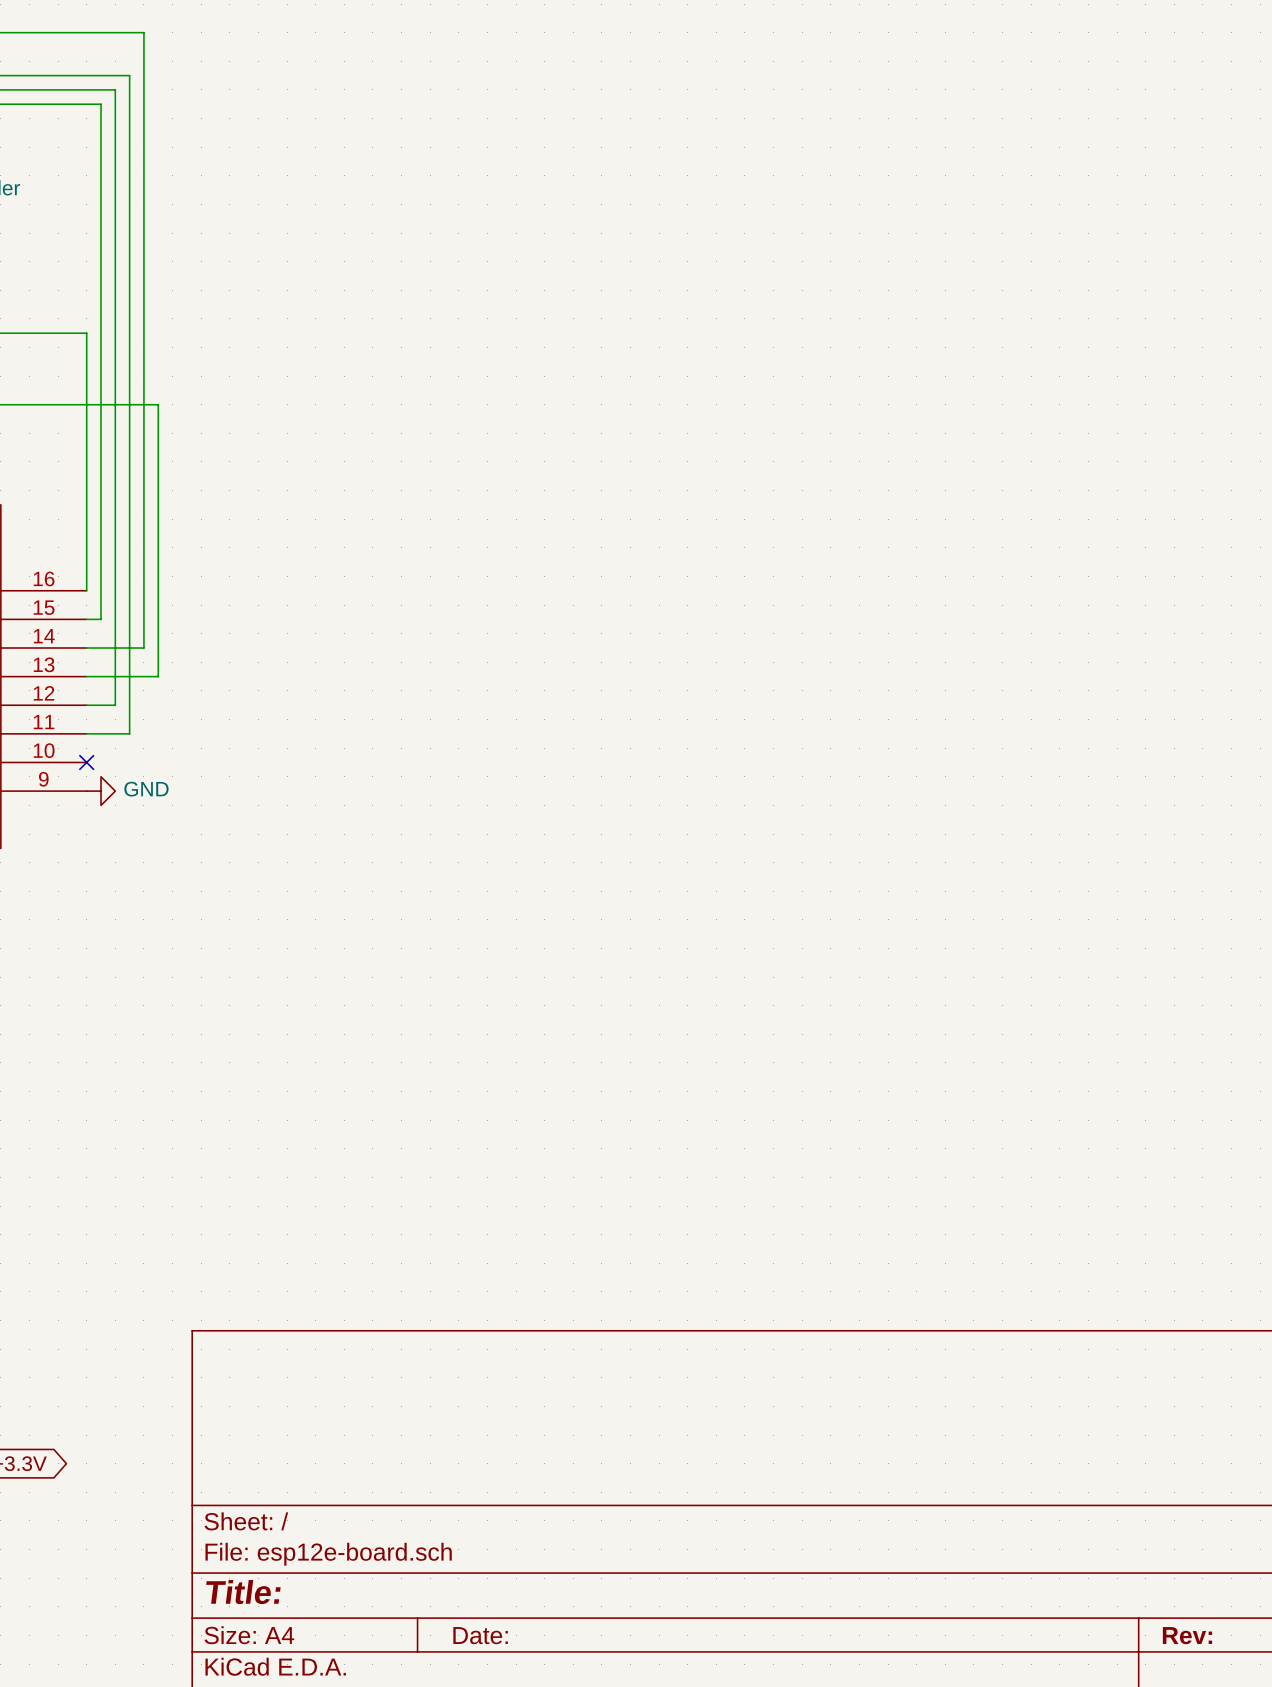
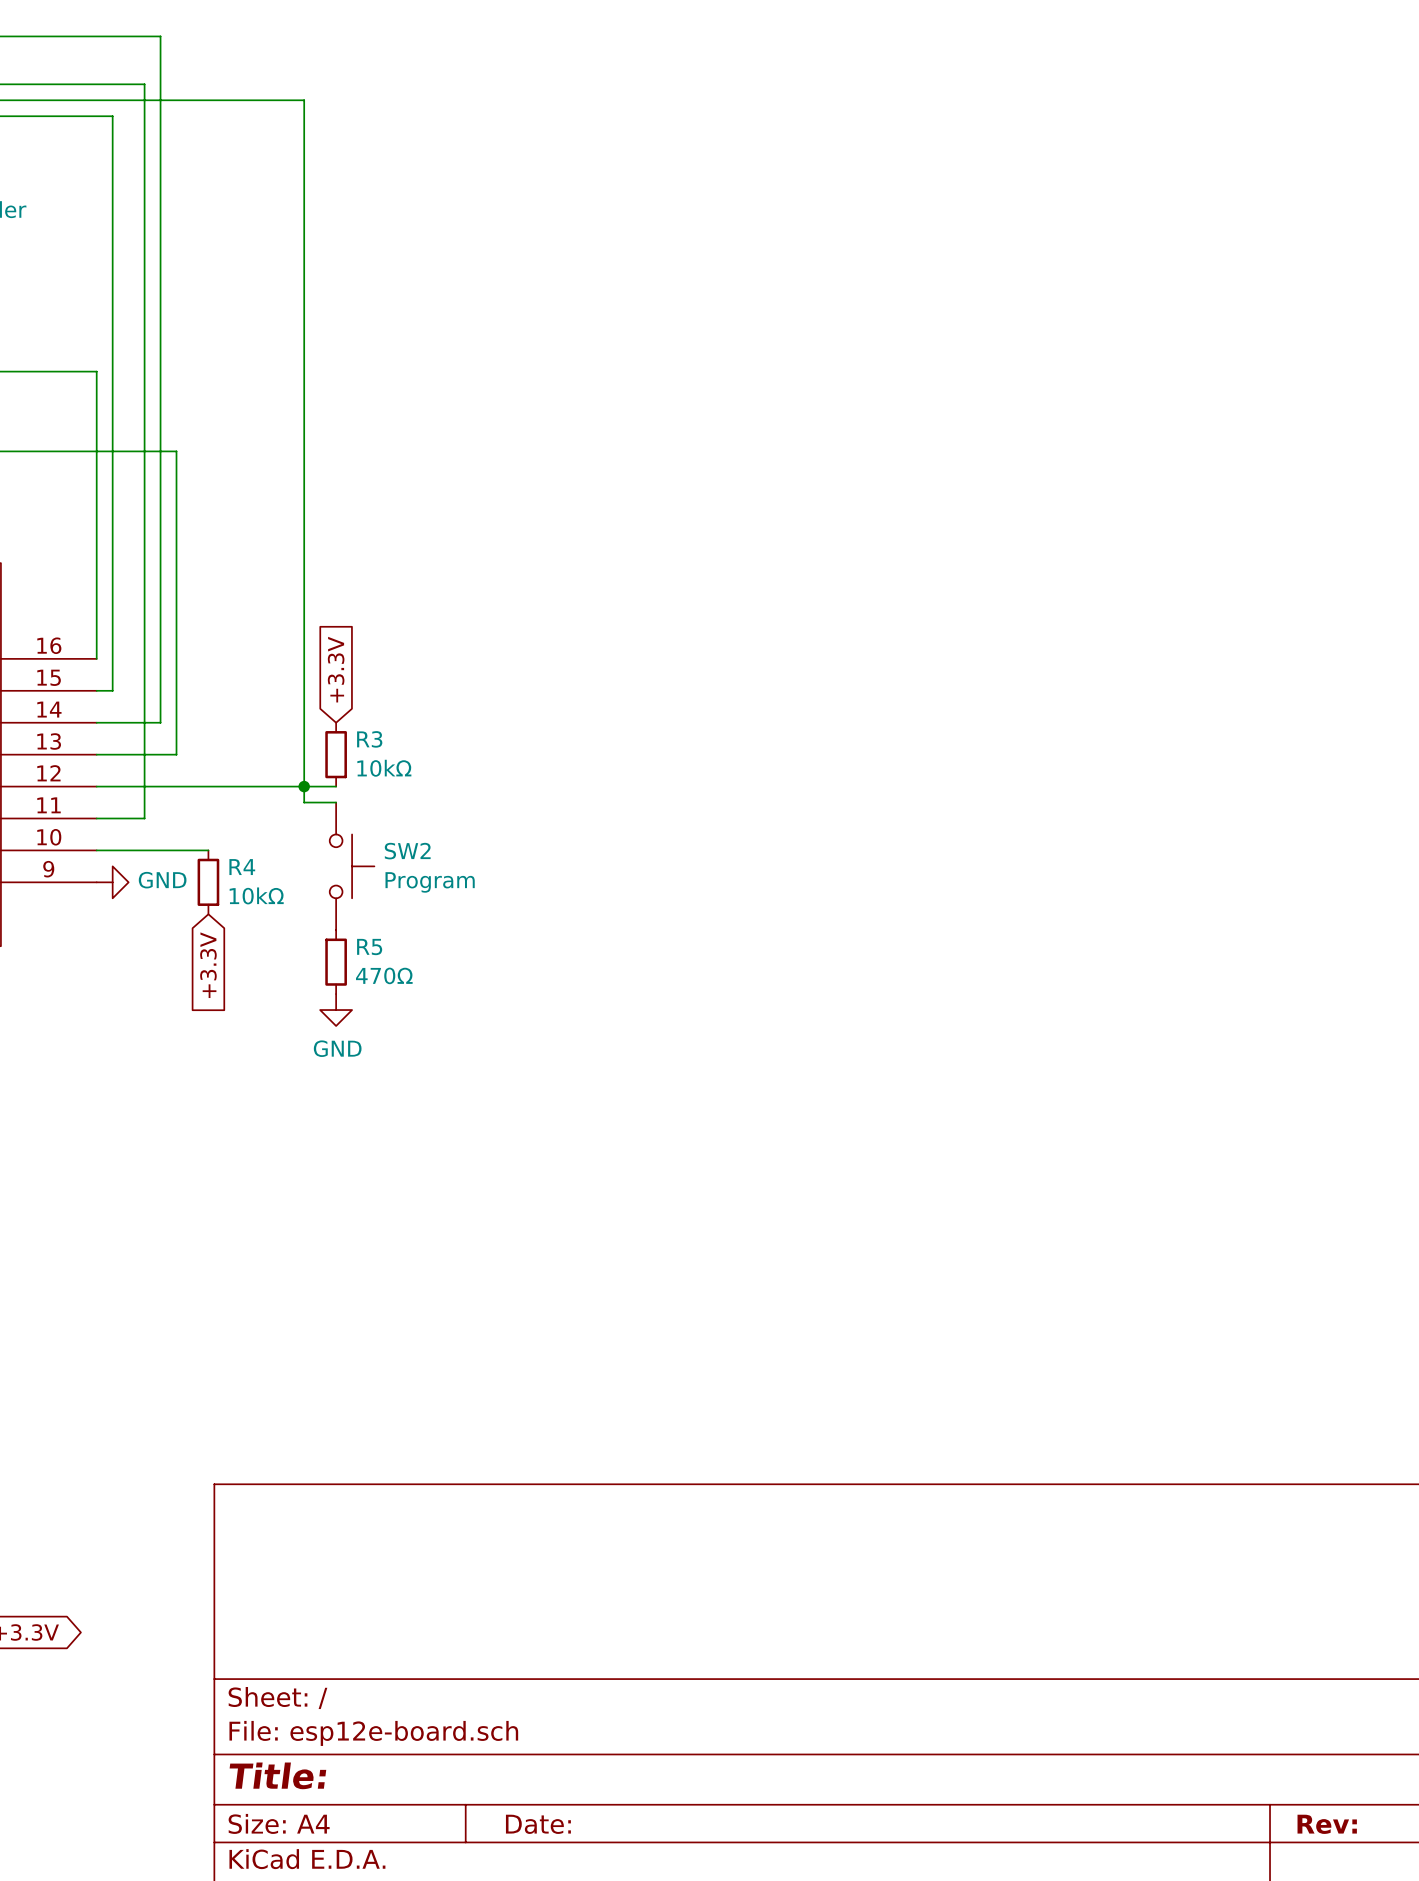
wire: (115, 89) (115, 705) -> (128, 100) (304, 100) (304, 802) (336, 802)
global label: none -> +3.3V (336, 669)
R3: none -> 10kΩ (336, 754)
wire: none -> (128, 786) (336, 786)
junction: none -> (304, 786)
wire: none -> (96, 850) (208, 850)
no-connect mark: (86, 762) -> none
SW2: none -> Program (352, 866)
R4: none -> 10kΩ (208, 882)
global label: none -> +3.3V (208, 965)
R5: none -> 470Ω (336, 962)
power symbol: none -> GND (336, 1010)

